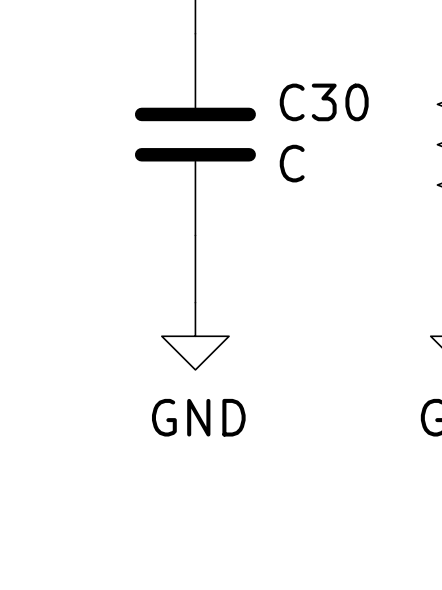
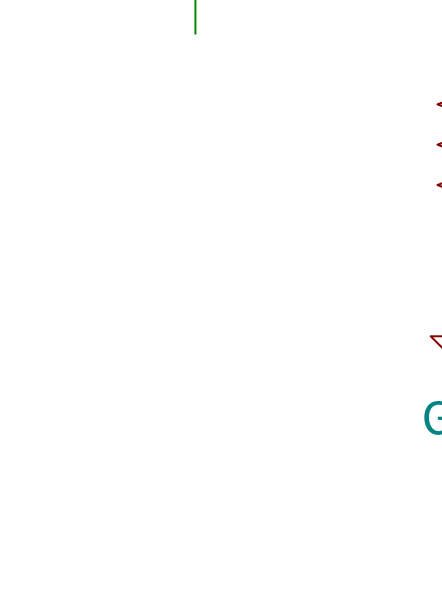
C30: C (195, 134) -> none
wire: (195, 235) (195, 302) -> none
power symbol: GND (195, 336) -> none

